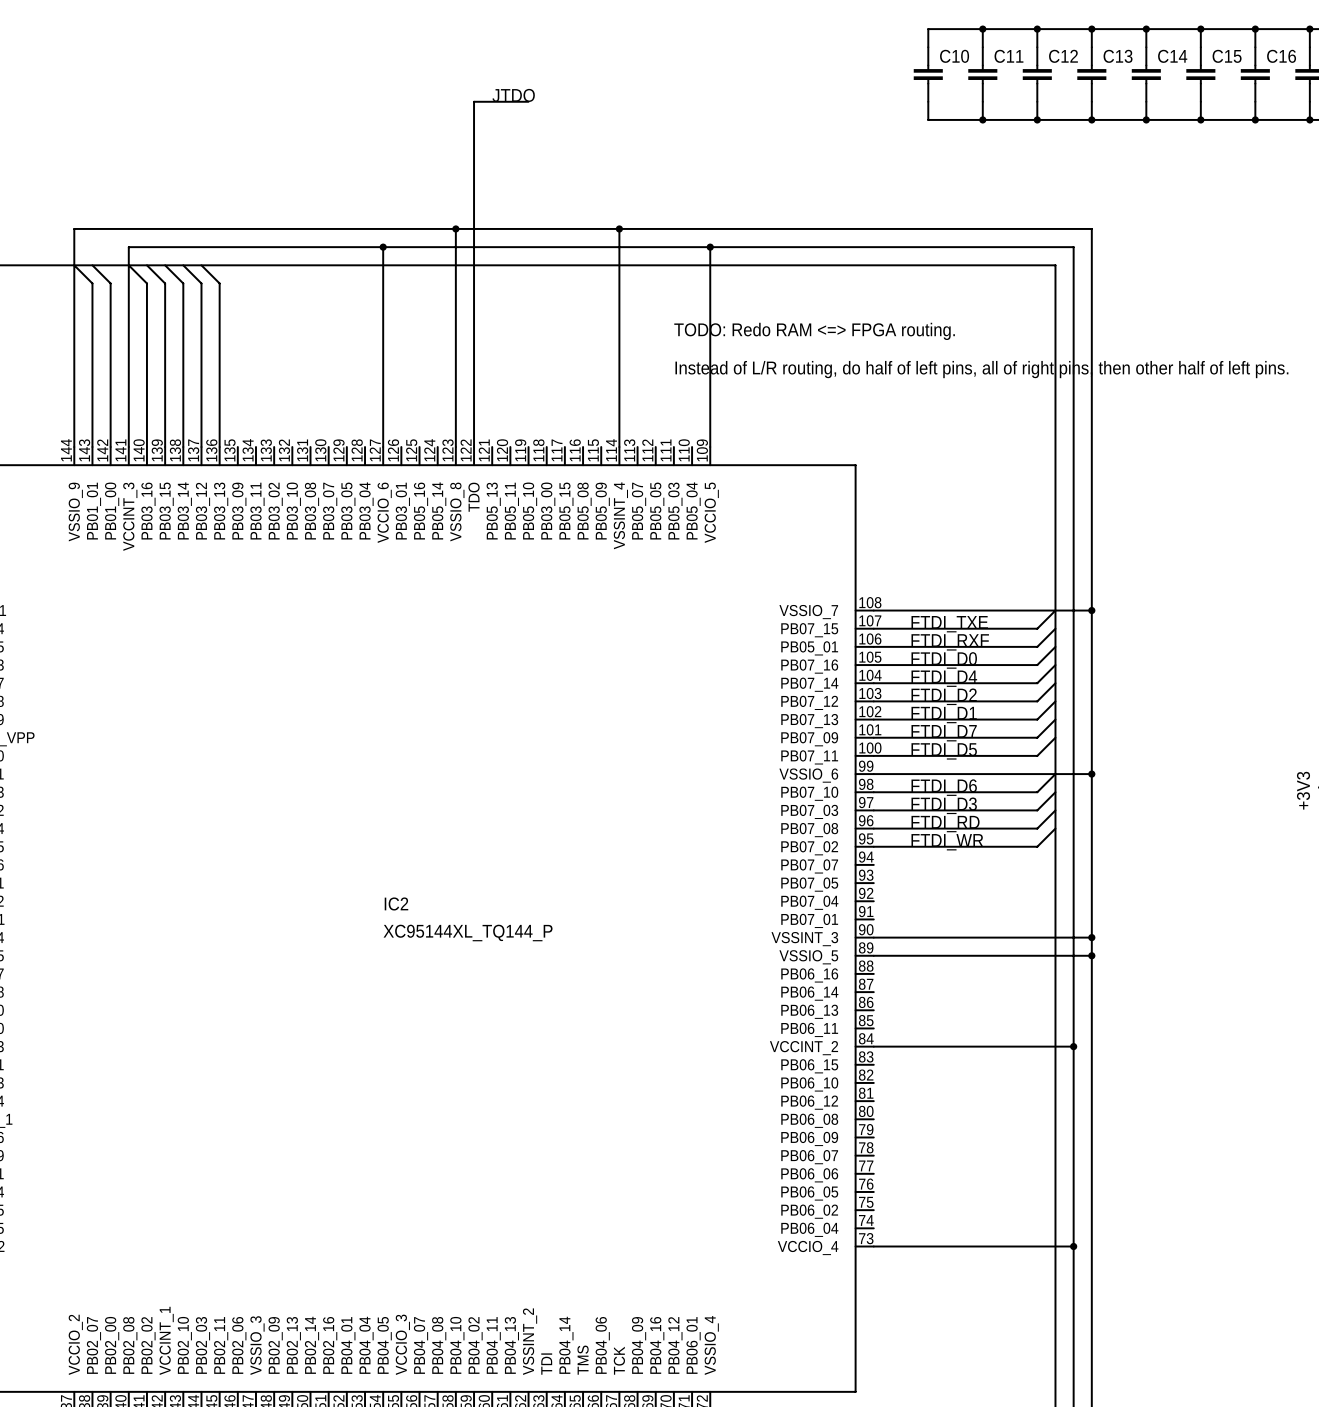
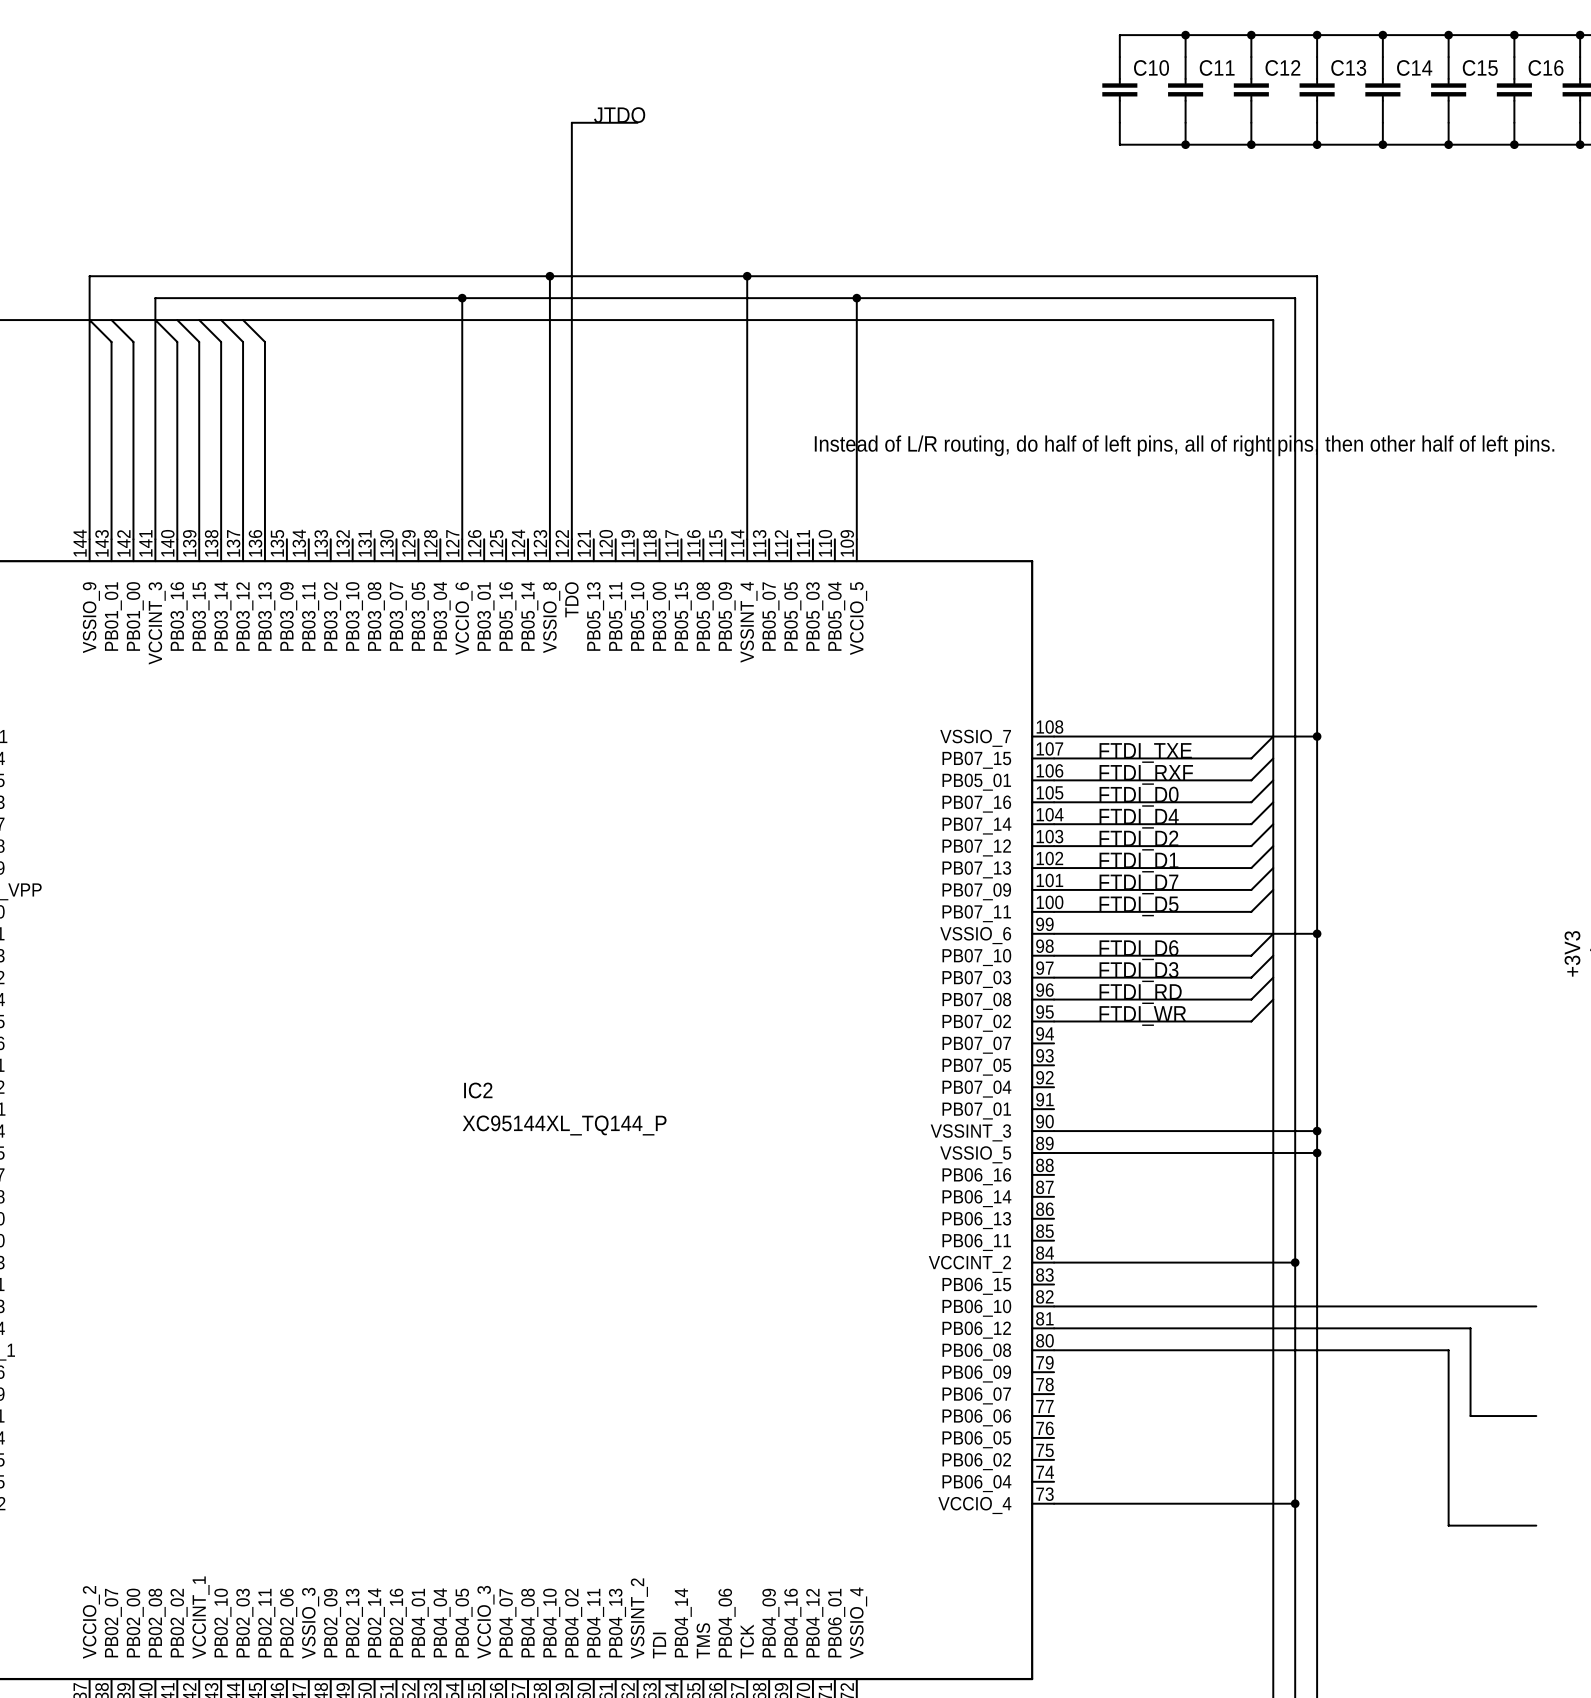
text: TODO: Redo RAM <=> FPGA routing. (814, 331) -> none
wire: none -> (1054, 1306) (1536, 1306)
wire: none -> (1054, 1328) (1470, 1328) (1470, 1416) (1536, 1416)
wire: none -> (1054, 1350) (1448, 1350) (1448, 1525) (1536, 1525)

